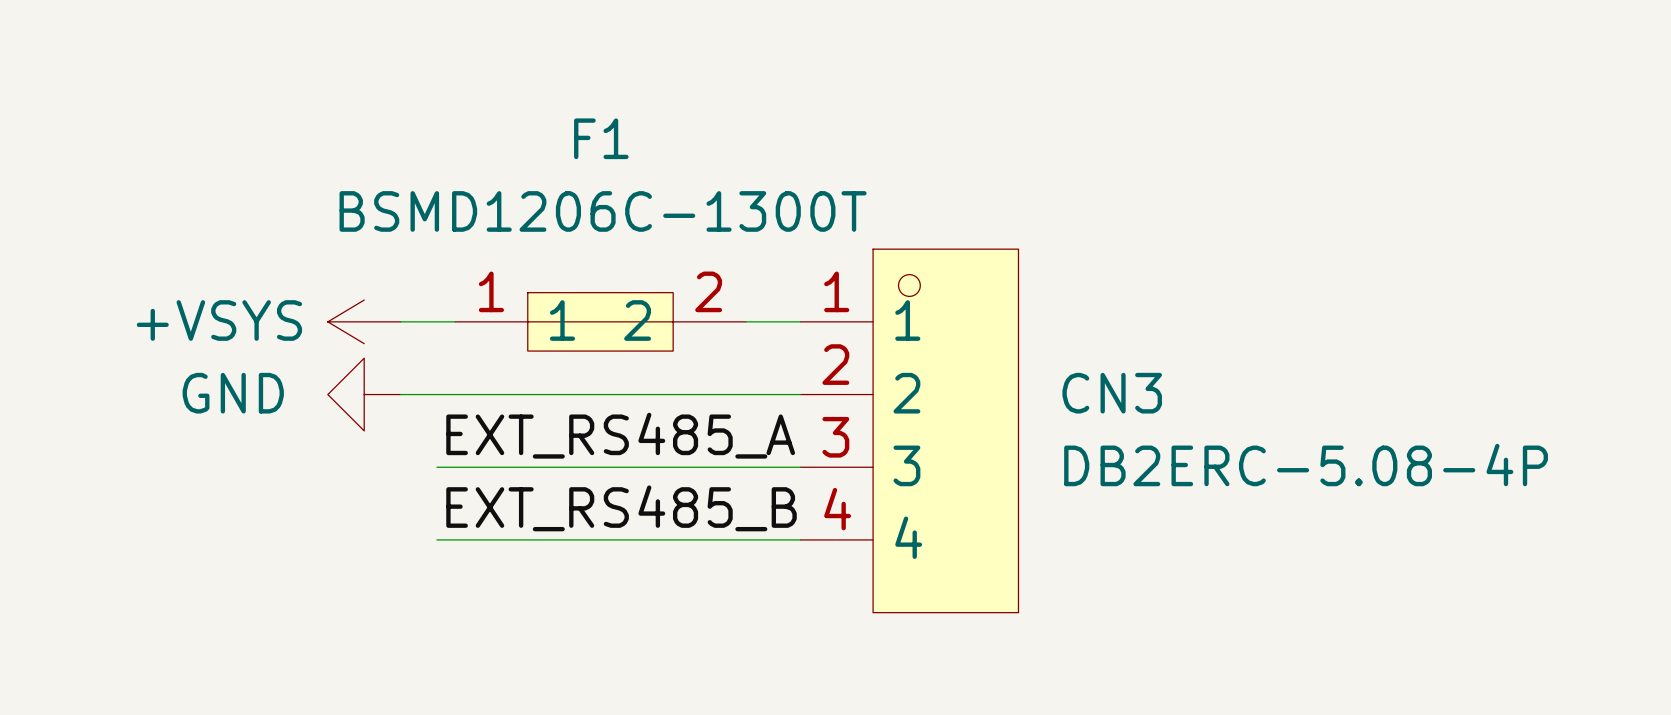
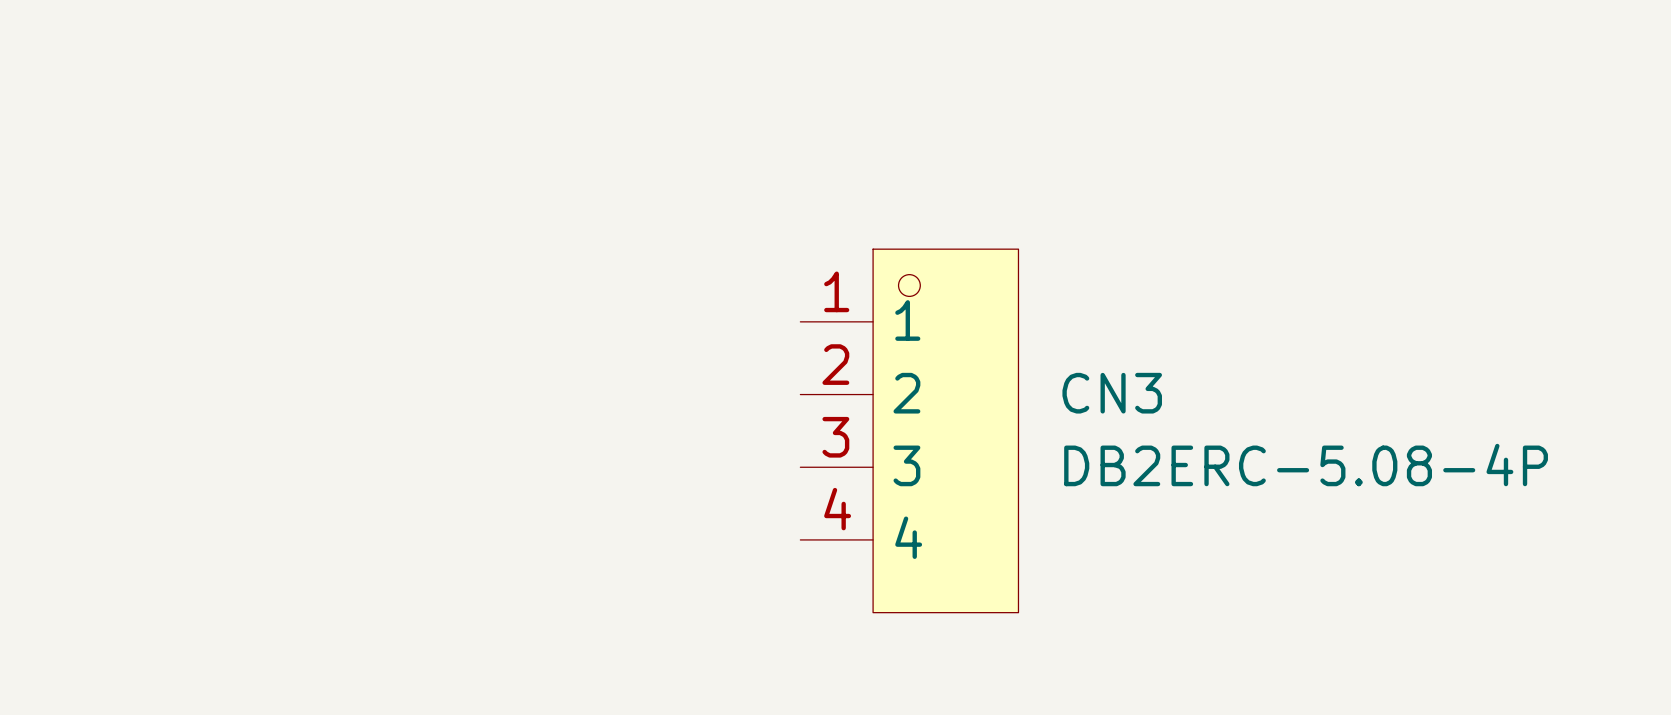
power symbol: +VSYS (364, 321) -> none
wire: (400, 321) (455, 321) -> none
F1: BSMD1206C-1300T (600, 321) -> none
wire: (745, 321) (800, 321) -> none
power symbol: GND (364, 394) -> none
wire: (400, 394) (800, 394) -> none
label: EXT_RS485_A (620, 435) -> none
wire: (436, 467) (800, 467) -> none
label: EXT_RS485_B (621, 508) -> none
wire: (436, 539) (800, 539) -> none

